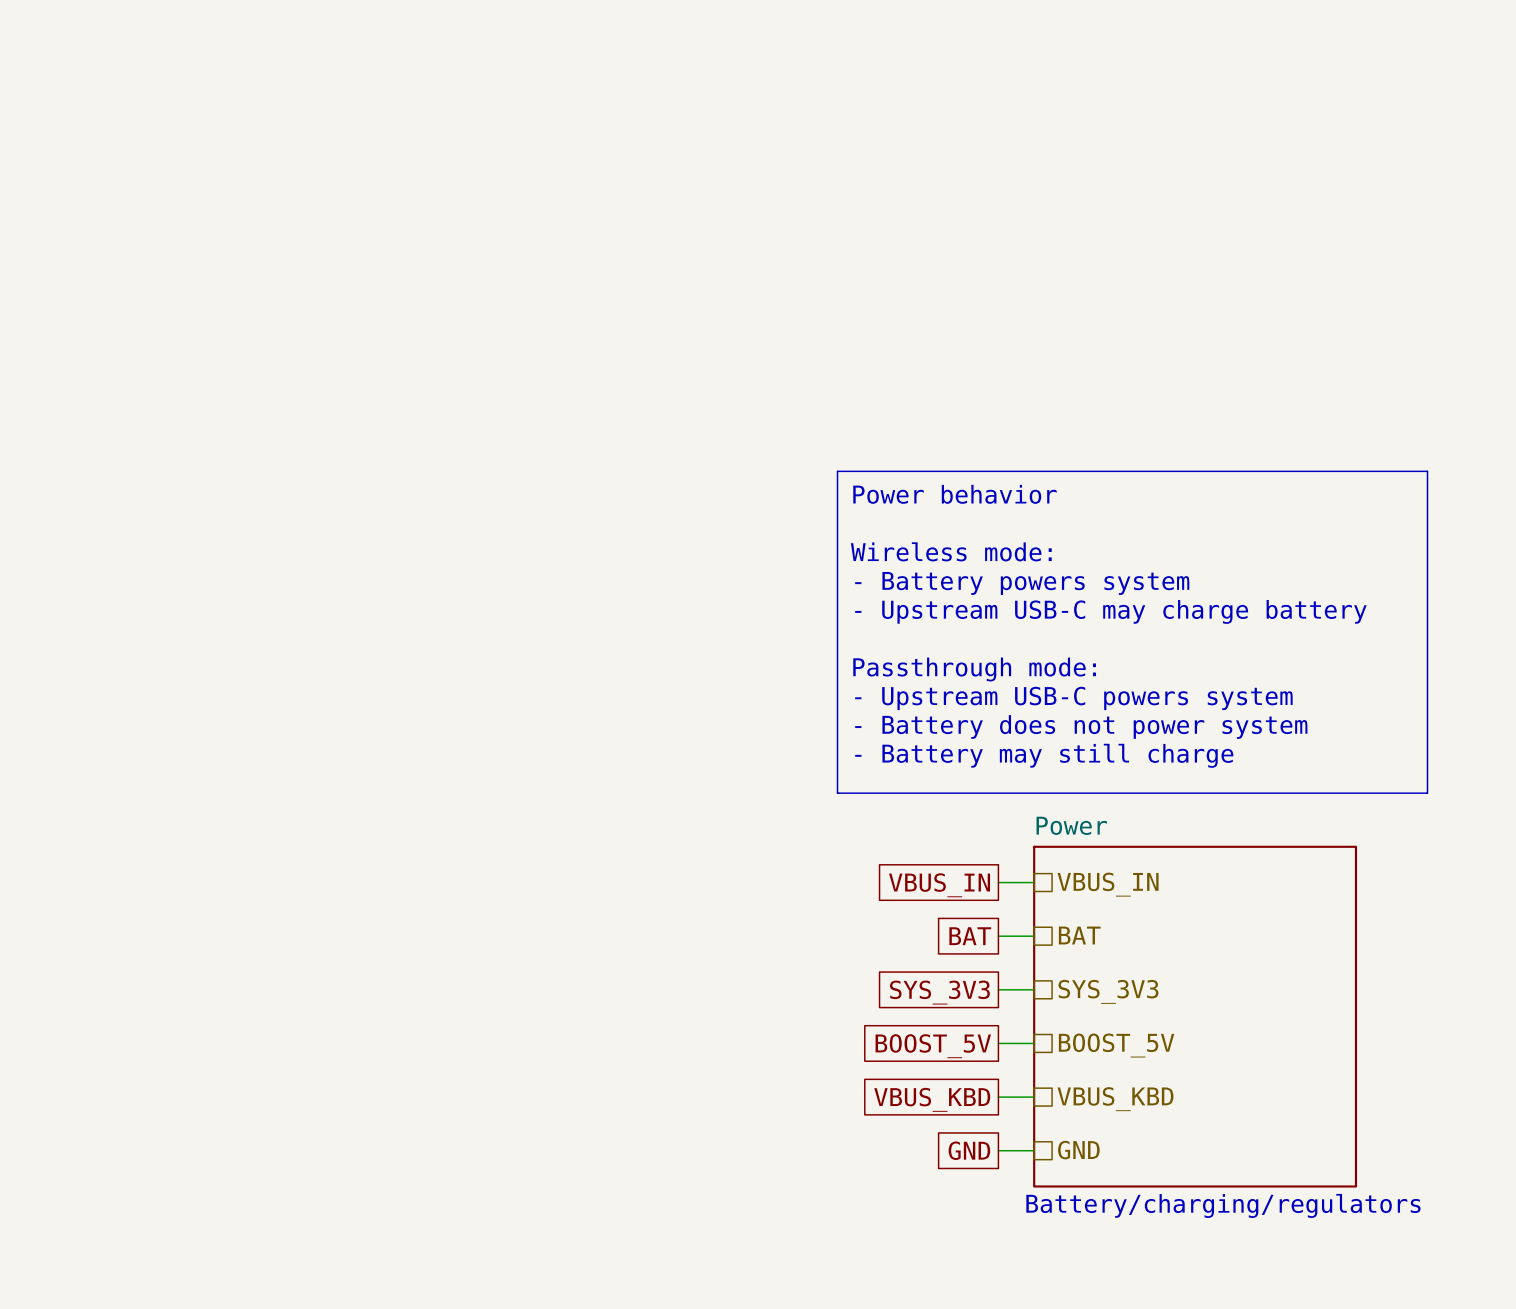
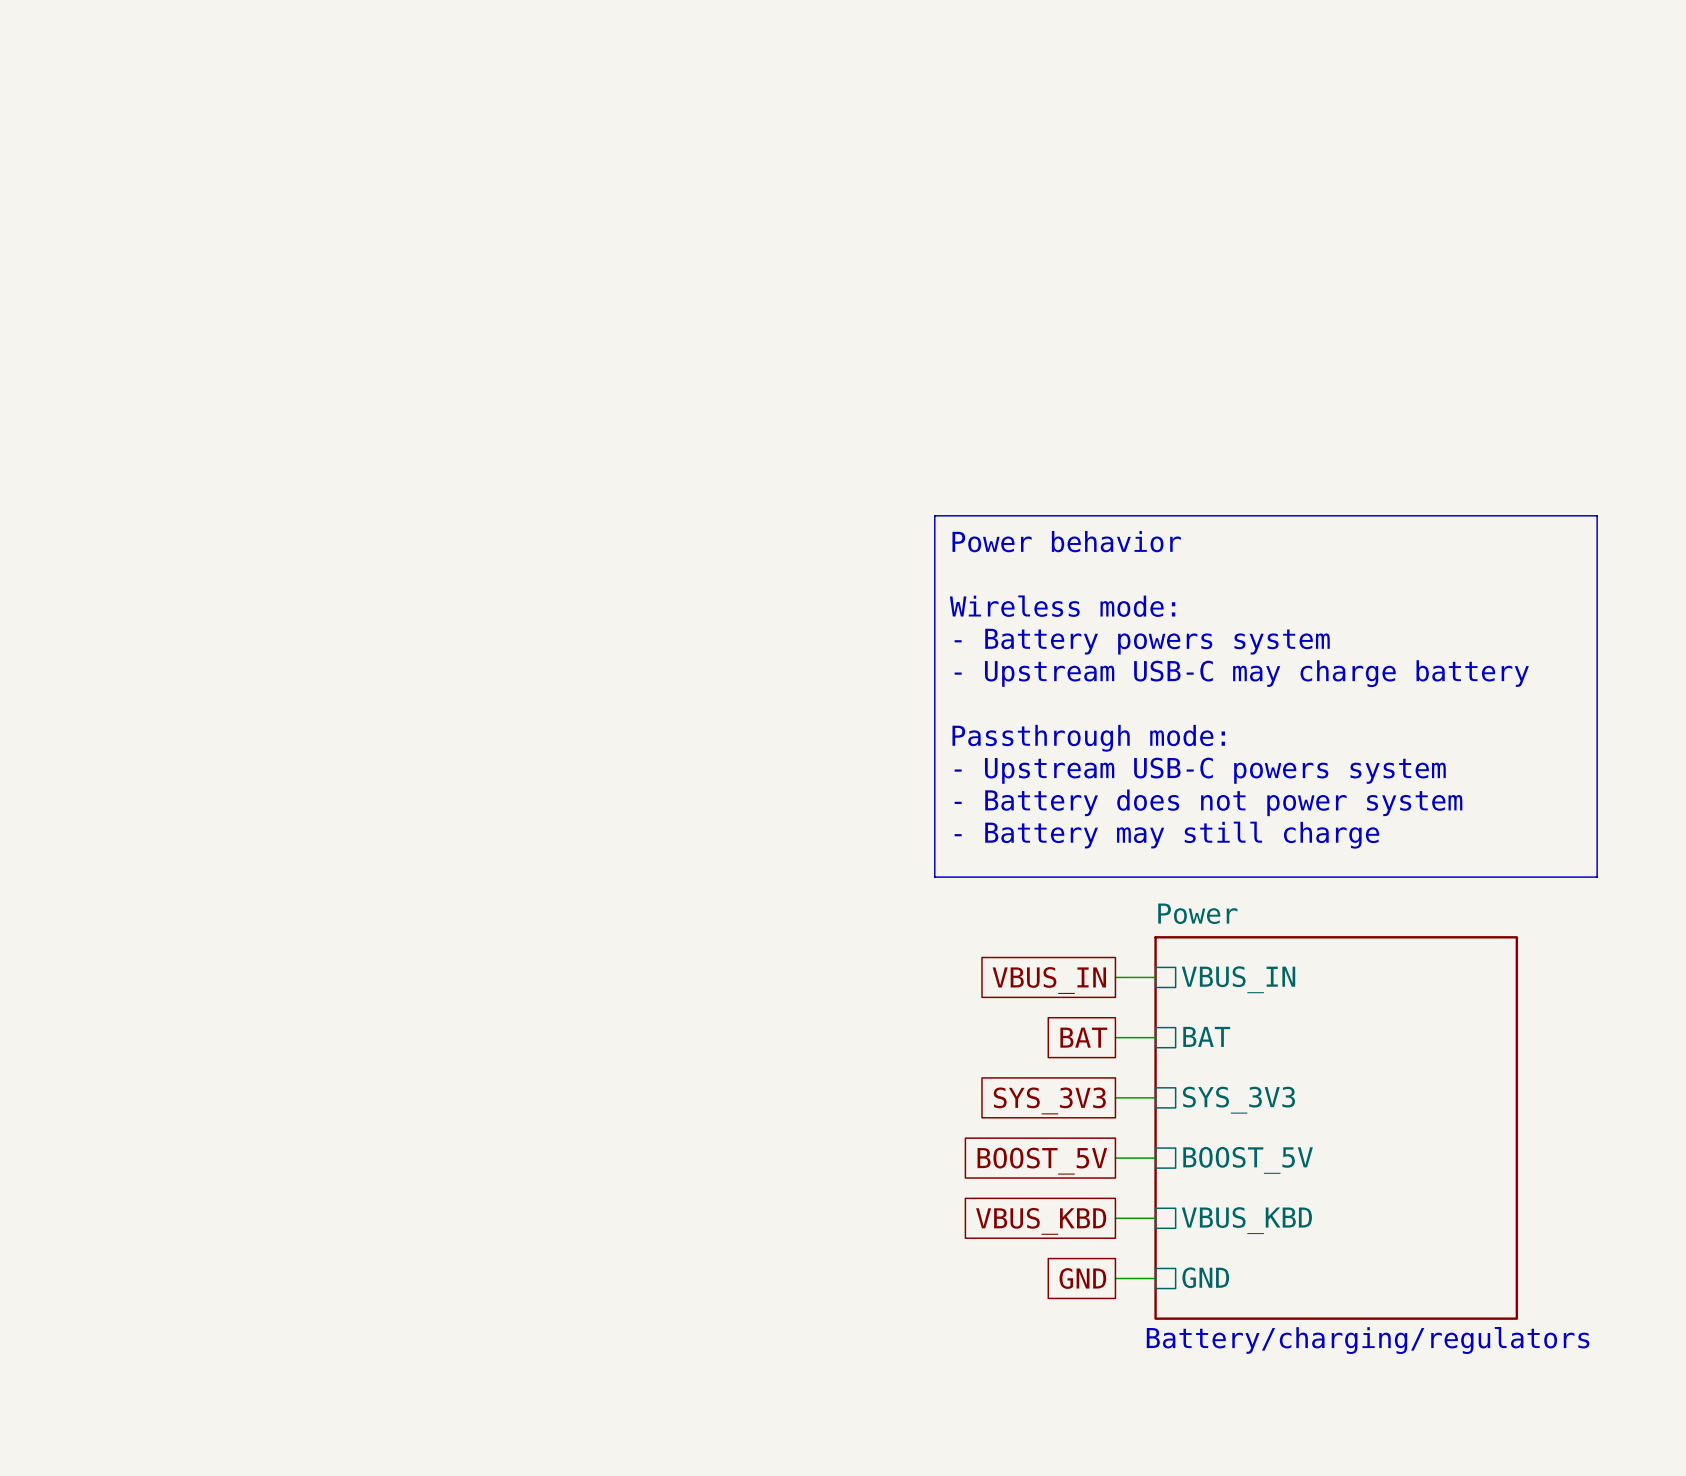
hierarchical label: VBUS_IN (1108, 884) -> none
sheet pin: none -> VBUS_IN (1238, 979)
hierarchical label: BAT (1079, 935) -> none
sheet pin: none -> BAT (1206, 1036)
hierarchical label: SYS_3V3 (1108, 991) -> none
sheet pin: none -> SYS_3V3 (1238, 1100)
hierarchical label: BOOST_5V (1116, 1045) -> none
sheet pin: none -> BOOST_5V (1248, 1160)
hierarchical label: VBUS_KBD (1115, 1099) -> none
sheet pin: none -> VBUS_KBD (1246, 1220)
hierarchical label: GND (1078, 1150) -> none
sheet pin: none -> GND (1205, 1277)

